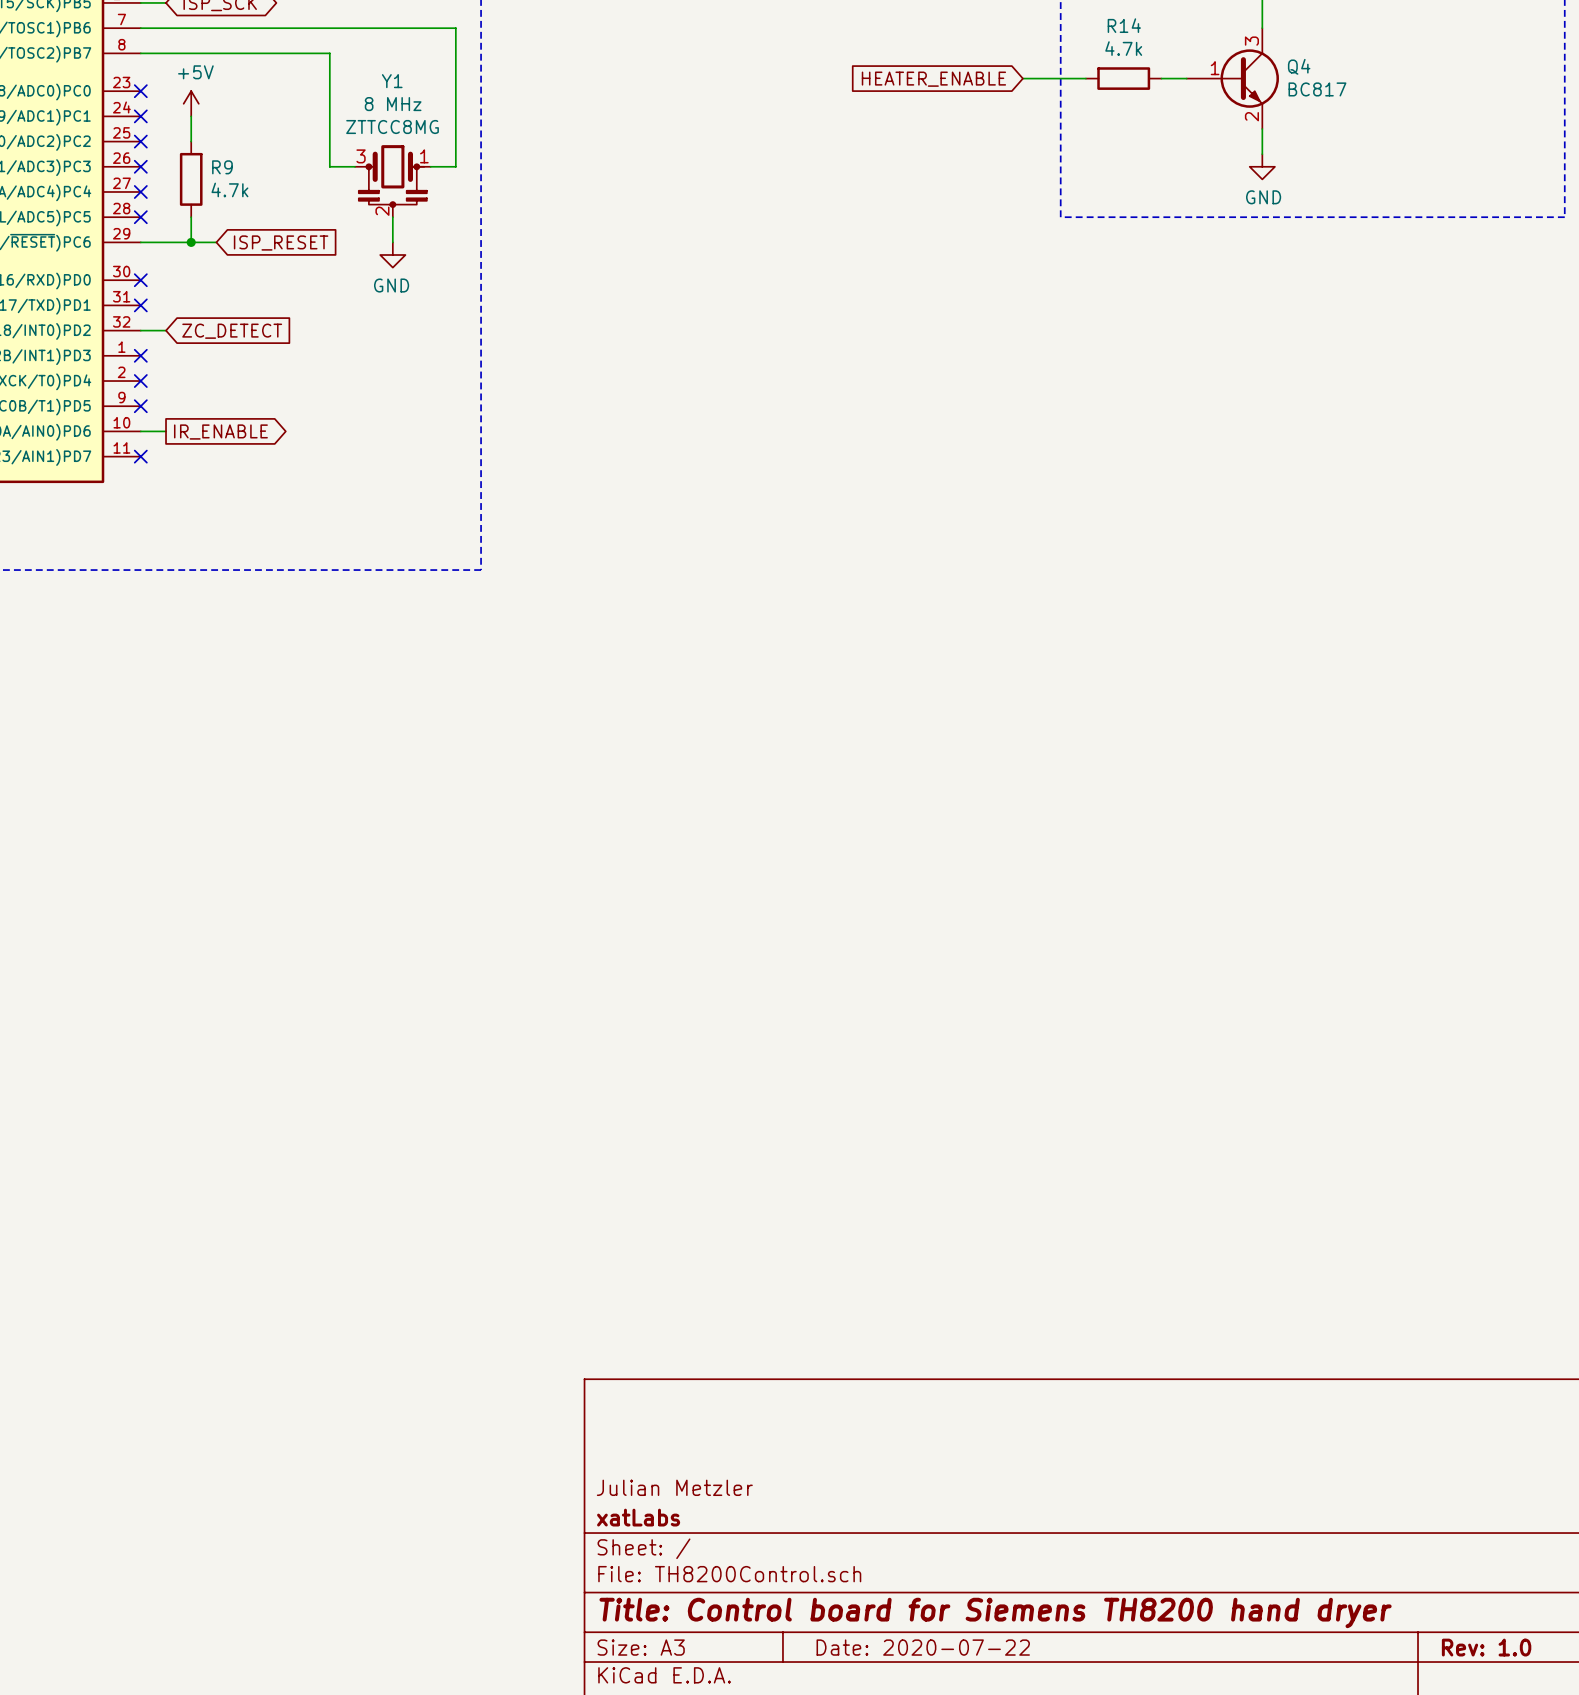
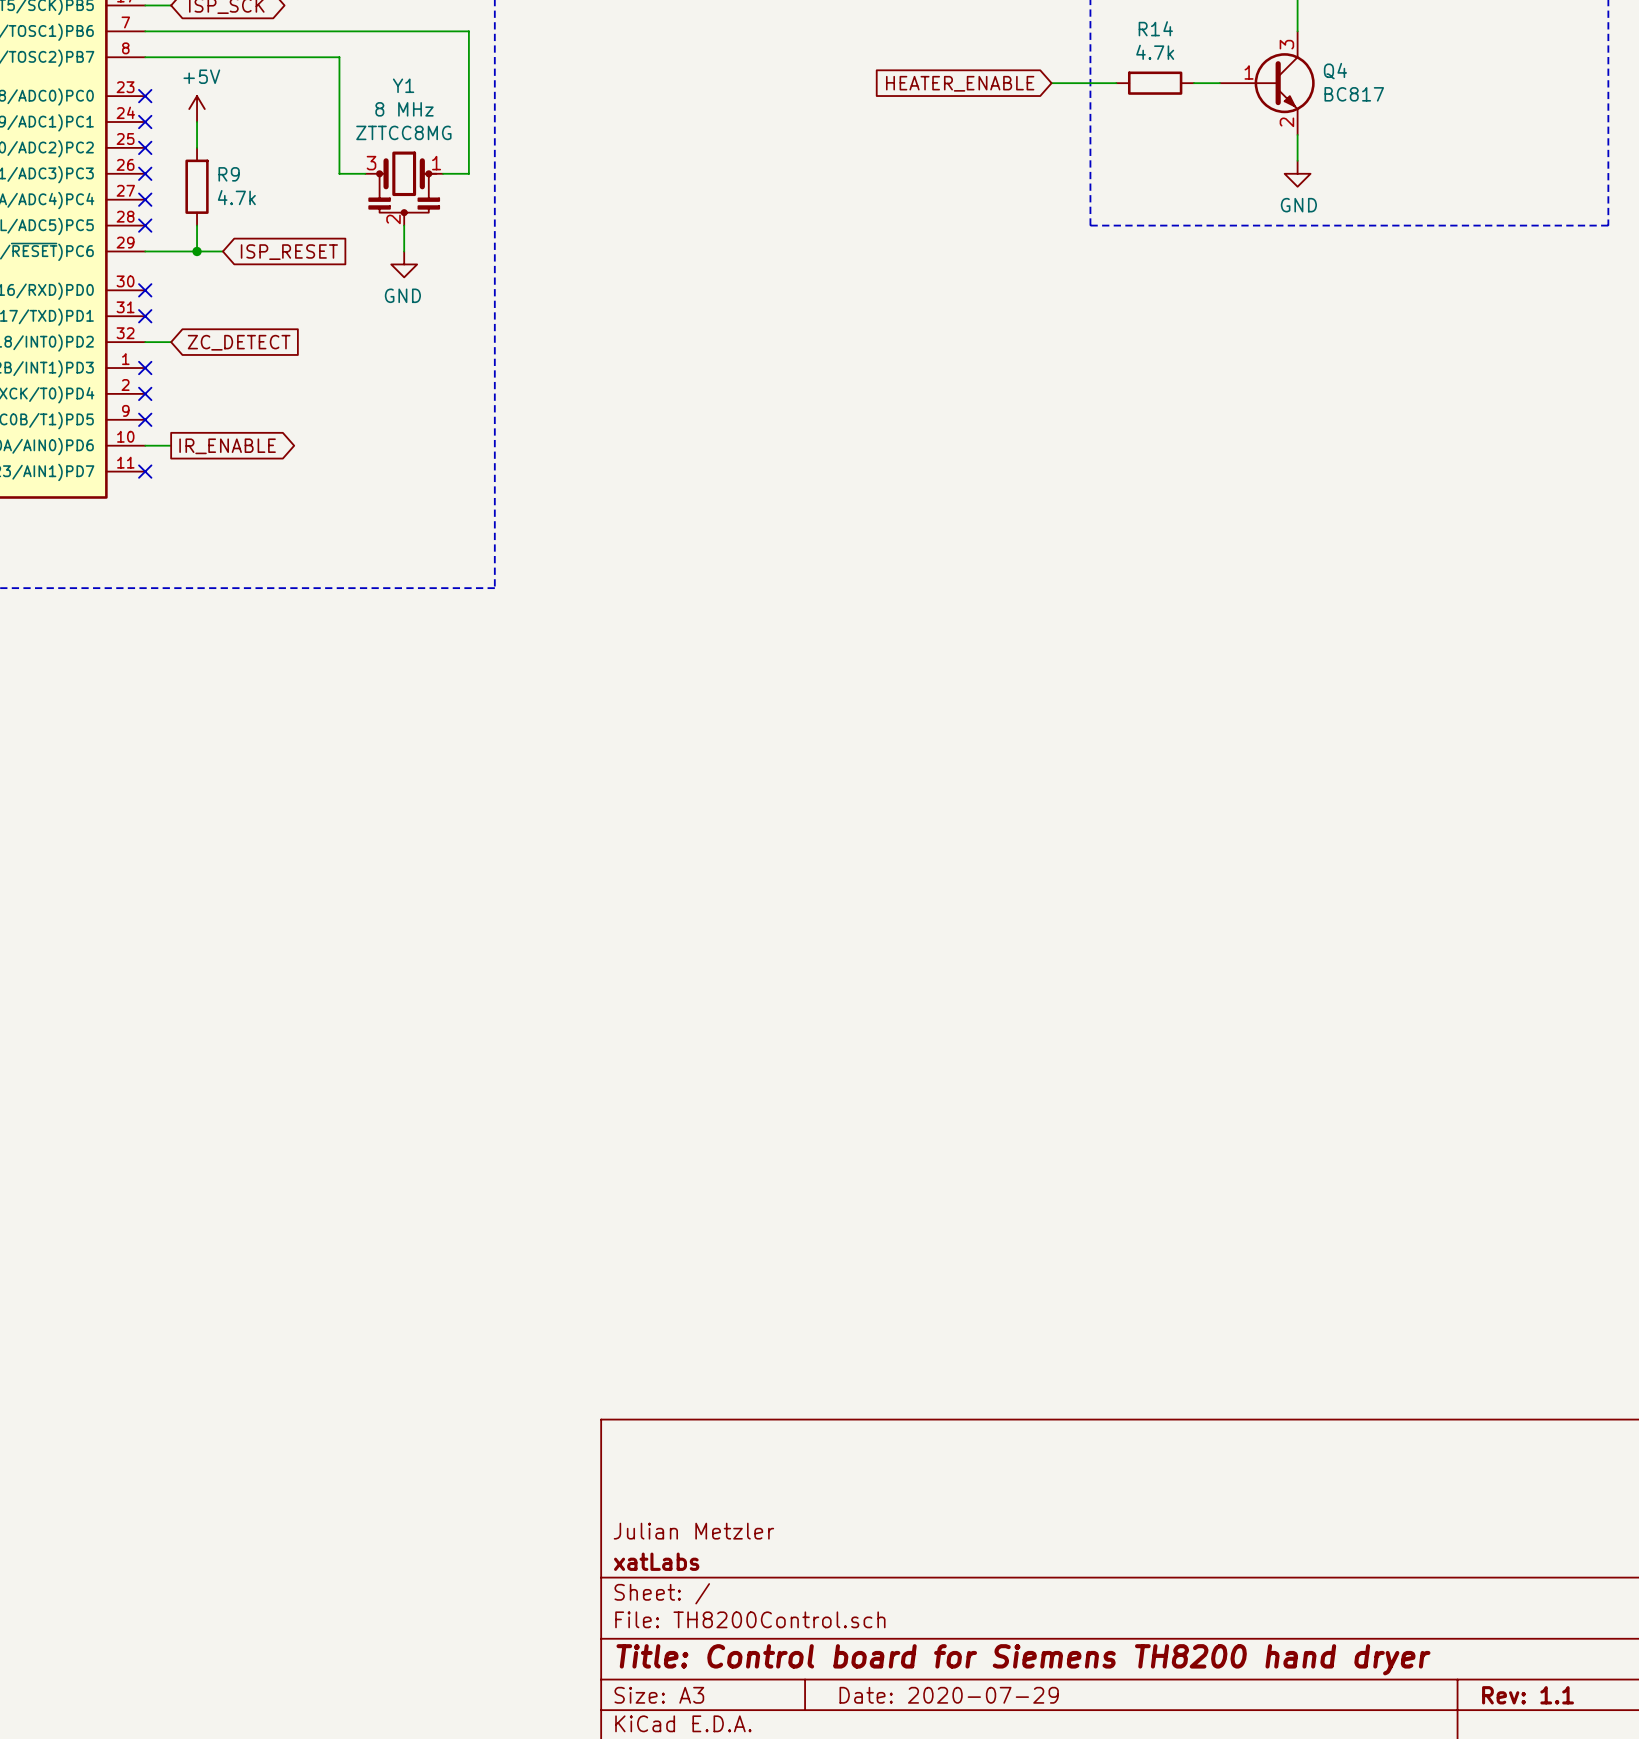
title block: Date: 2020-07-22 (923, 1647) -> Date: 2020-07-29 (949, 1695)
title block: Rev: 1.0 (1486, 1647) -> Rev: 1.1 (1528, 1695)

